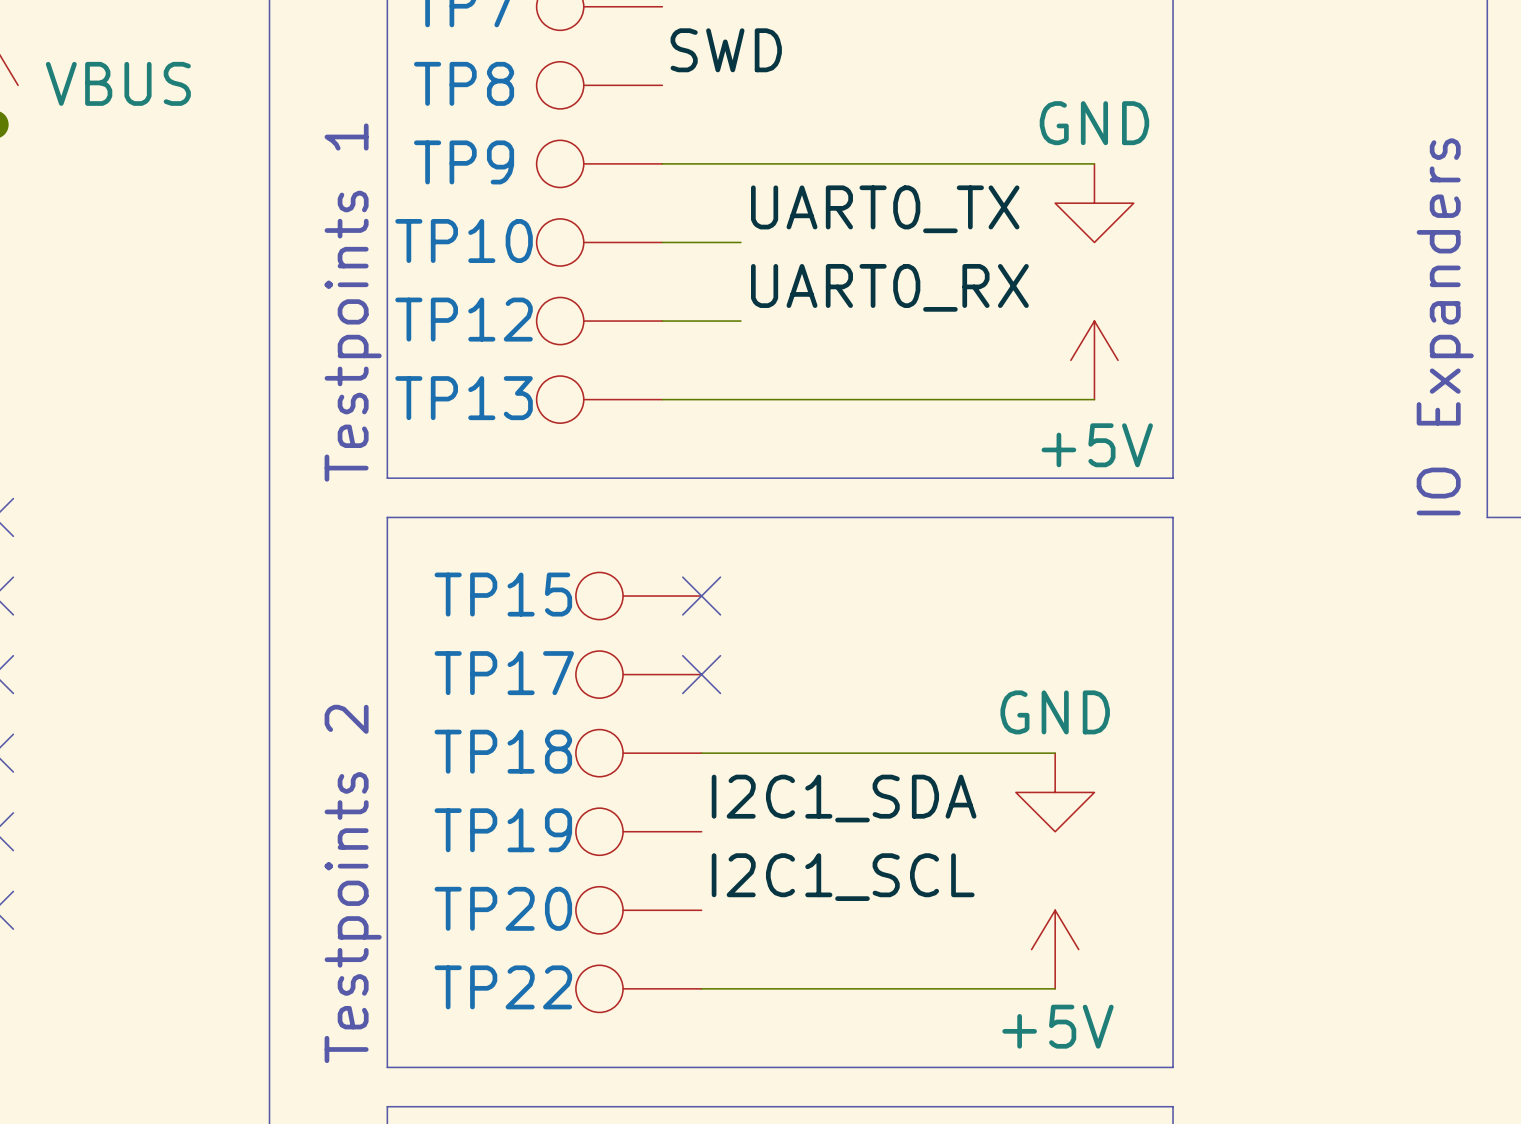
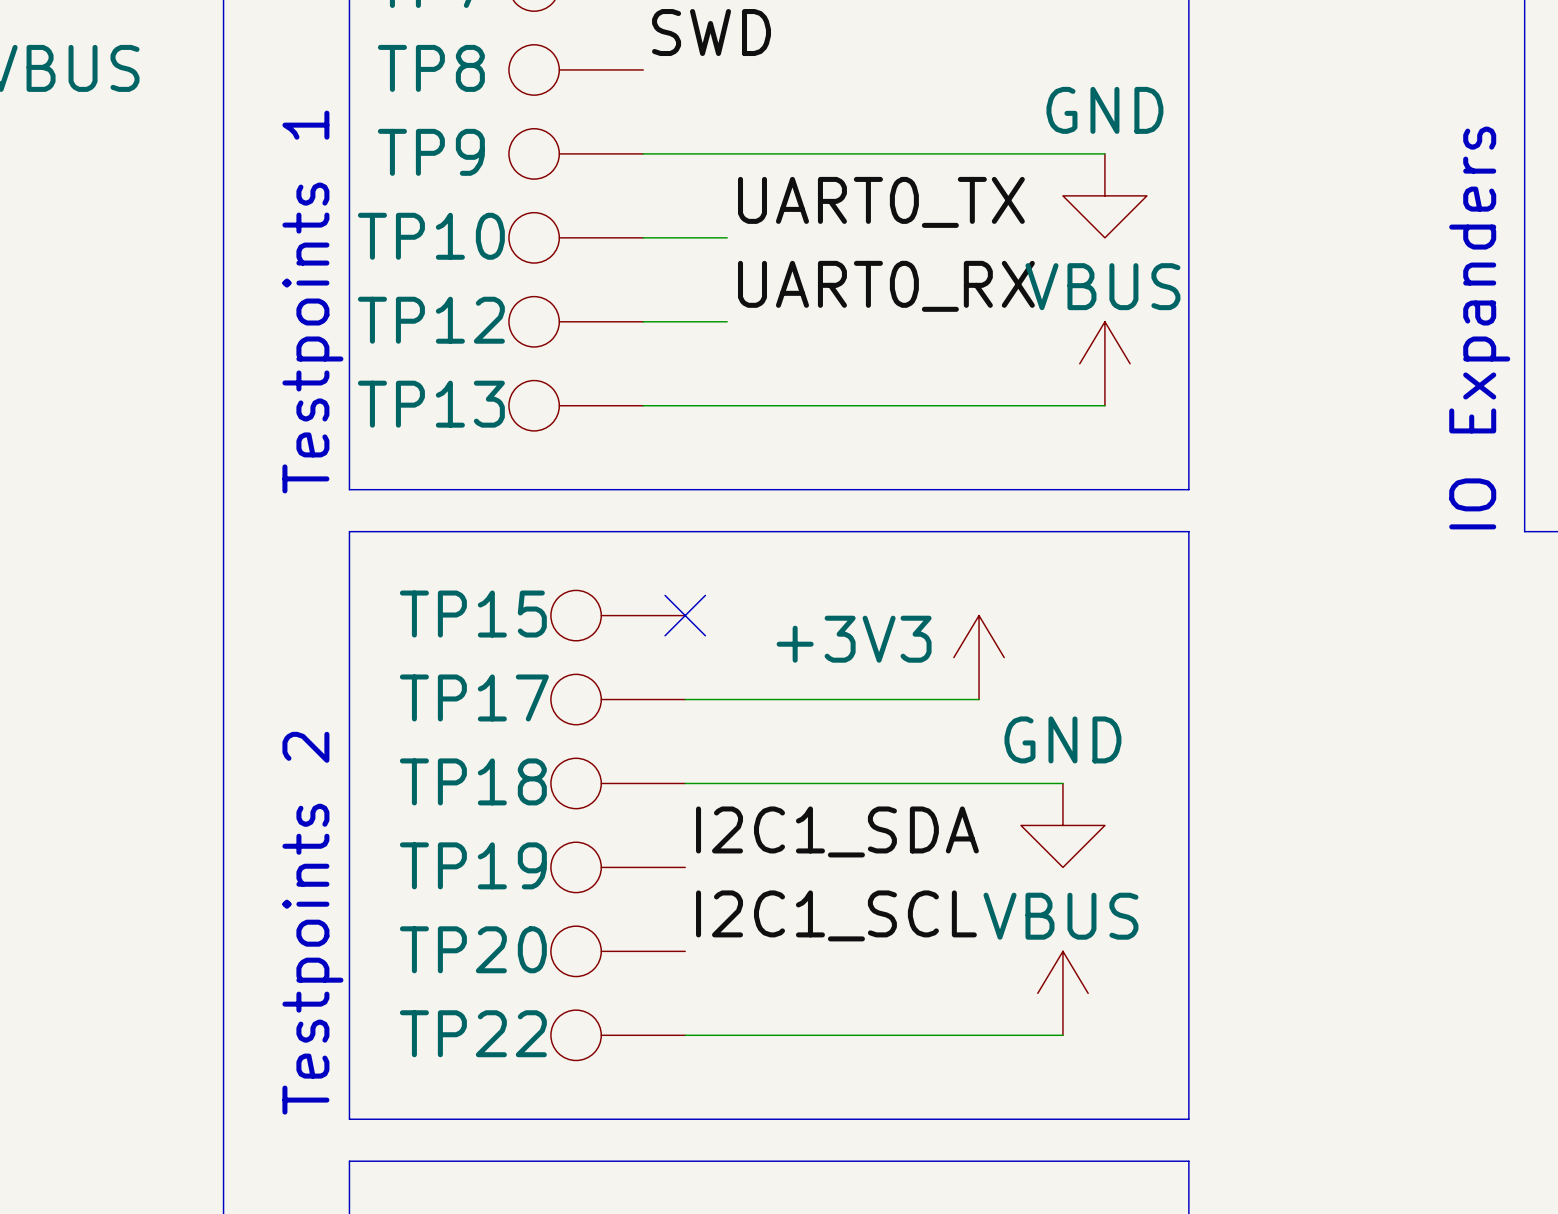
power symbol: +5V (1094, 360) -> VBUS (1104, 363)
power symbol: none -> +3V3 (979, 657)
wire: none -> (685, 699) (979, 699)
no-connect mark: (701, 674) -> none
power symbol: +5V (1055, 949) -> VBUS (1062, 993)

